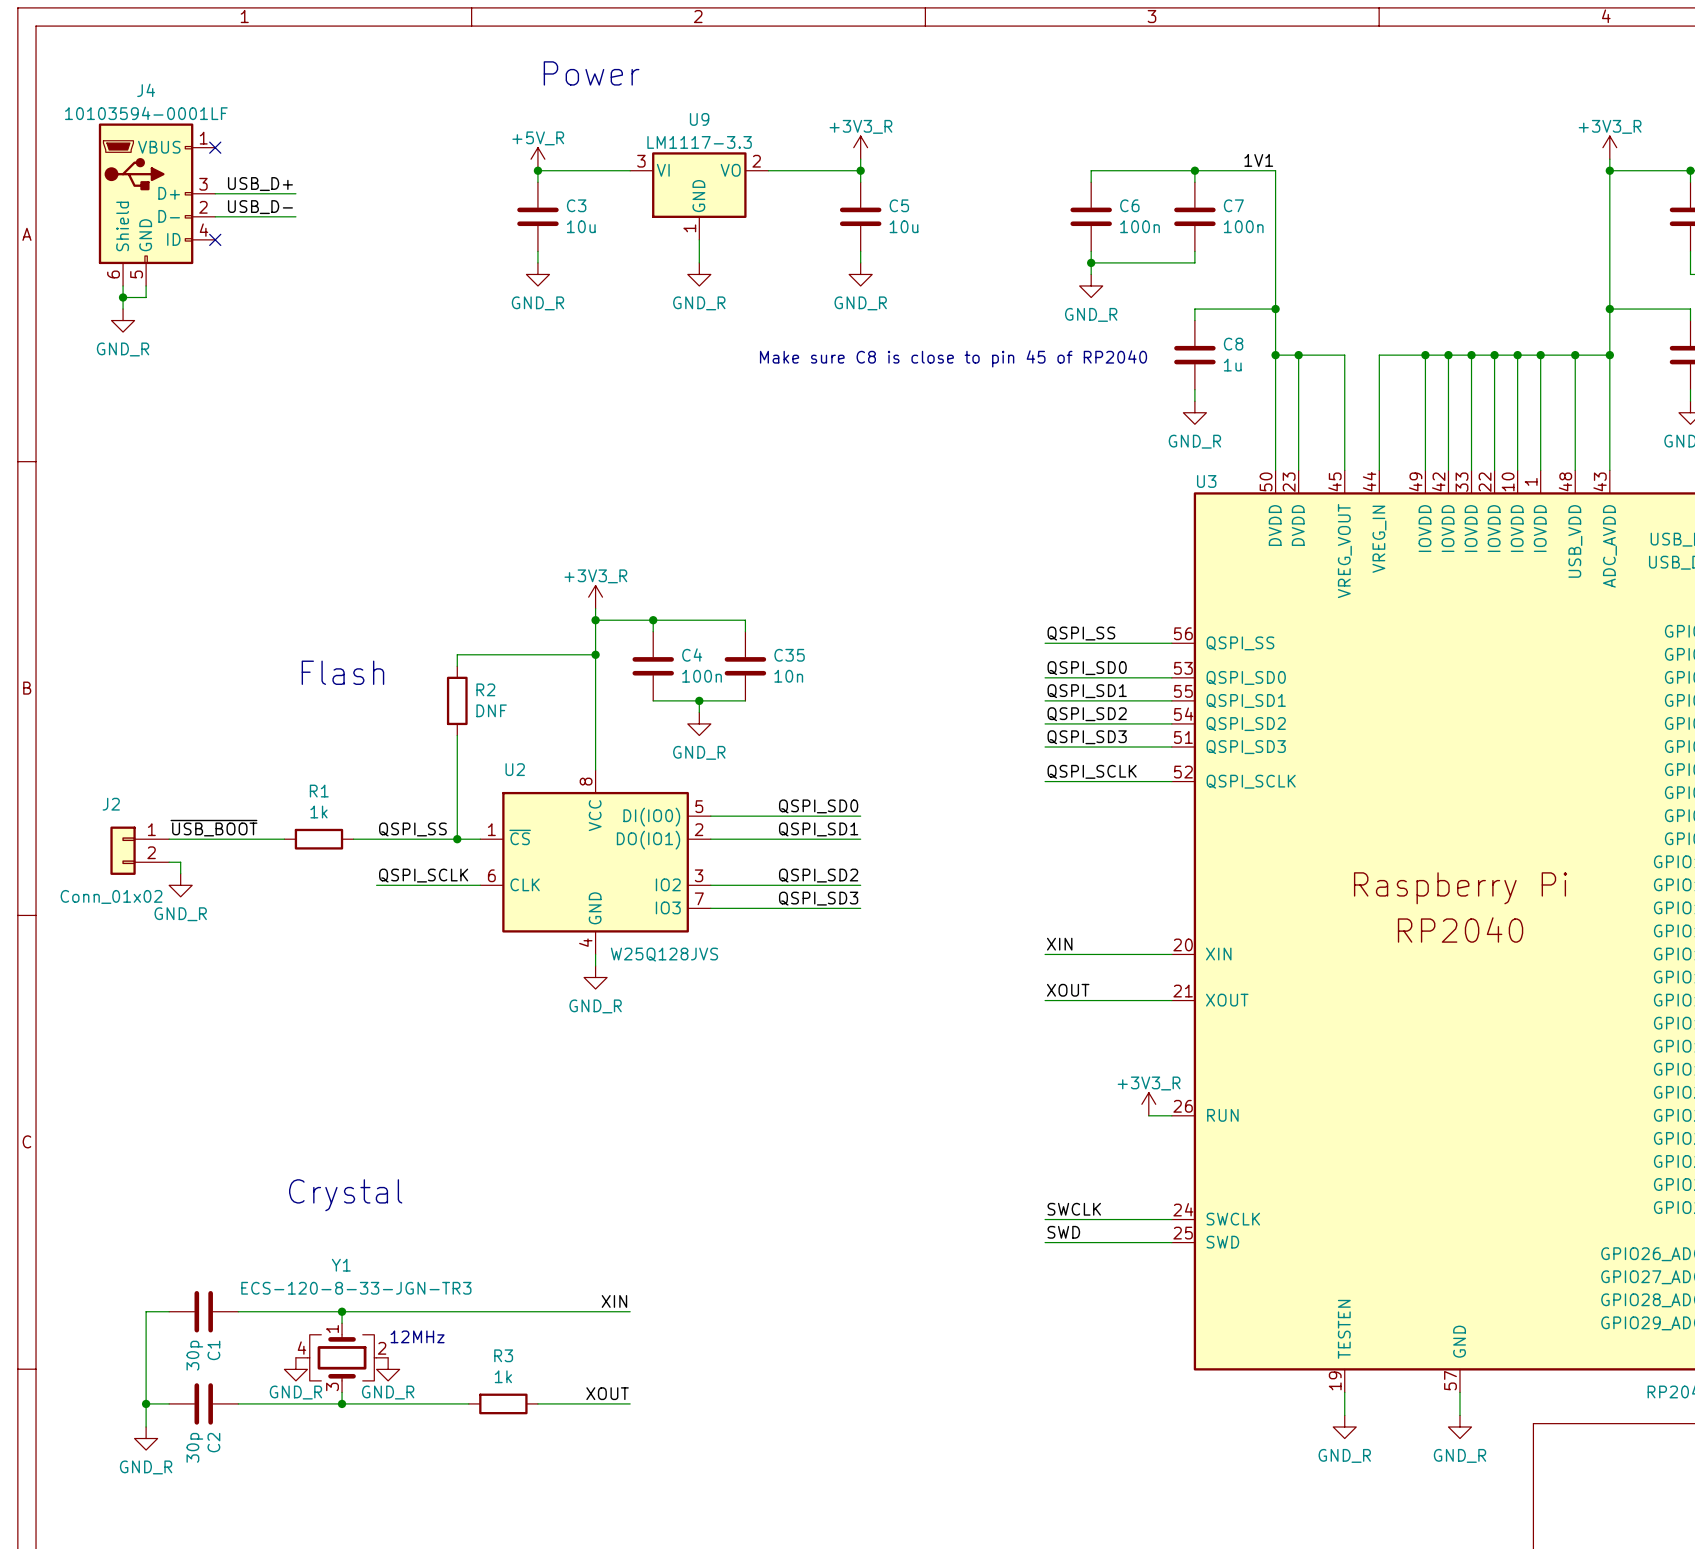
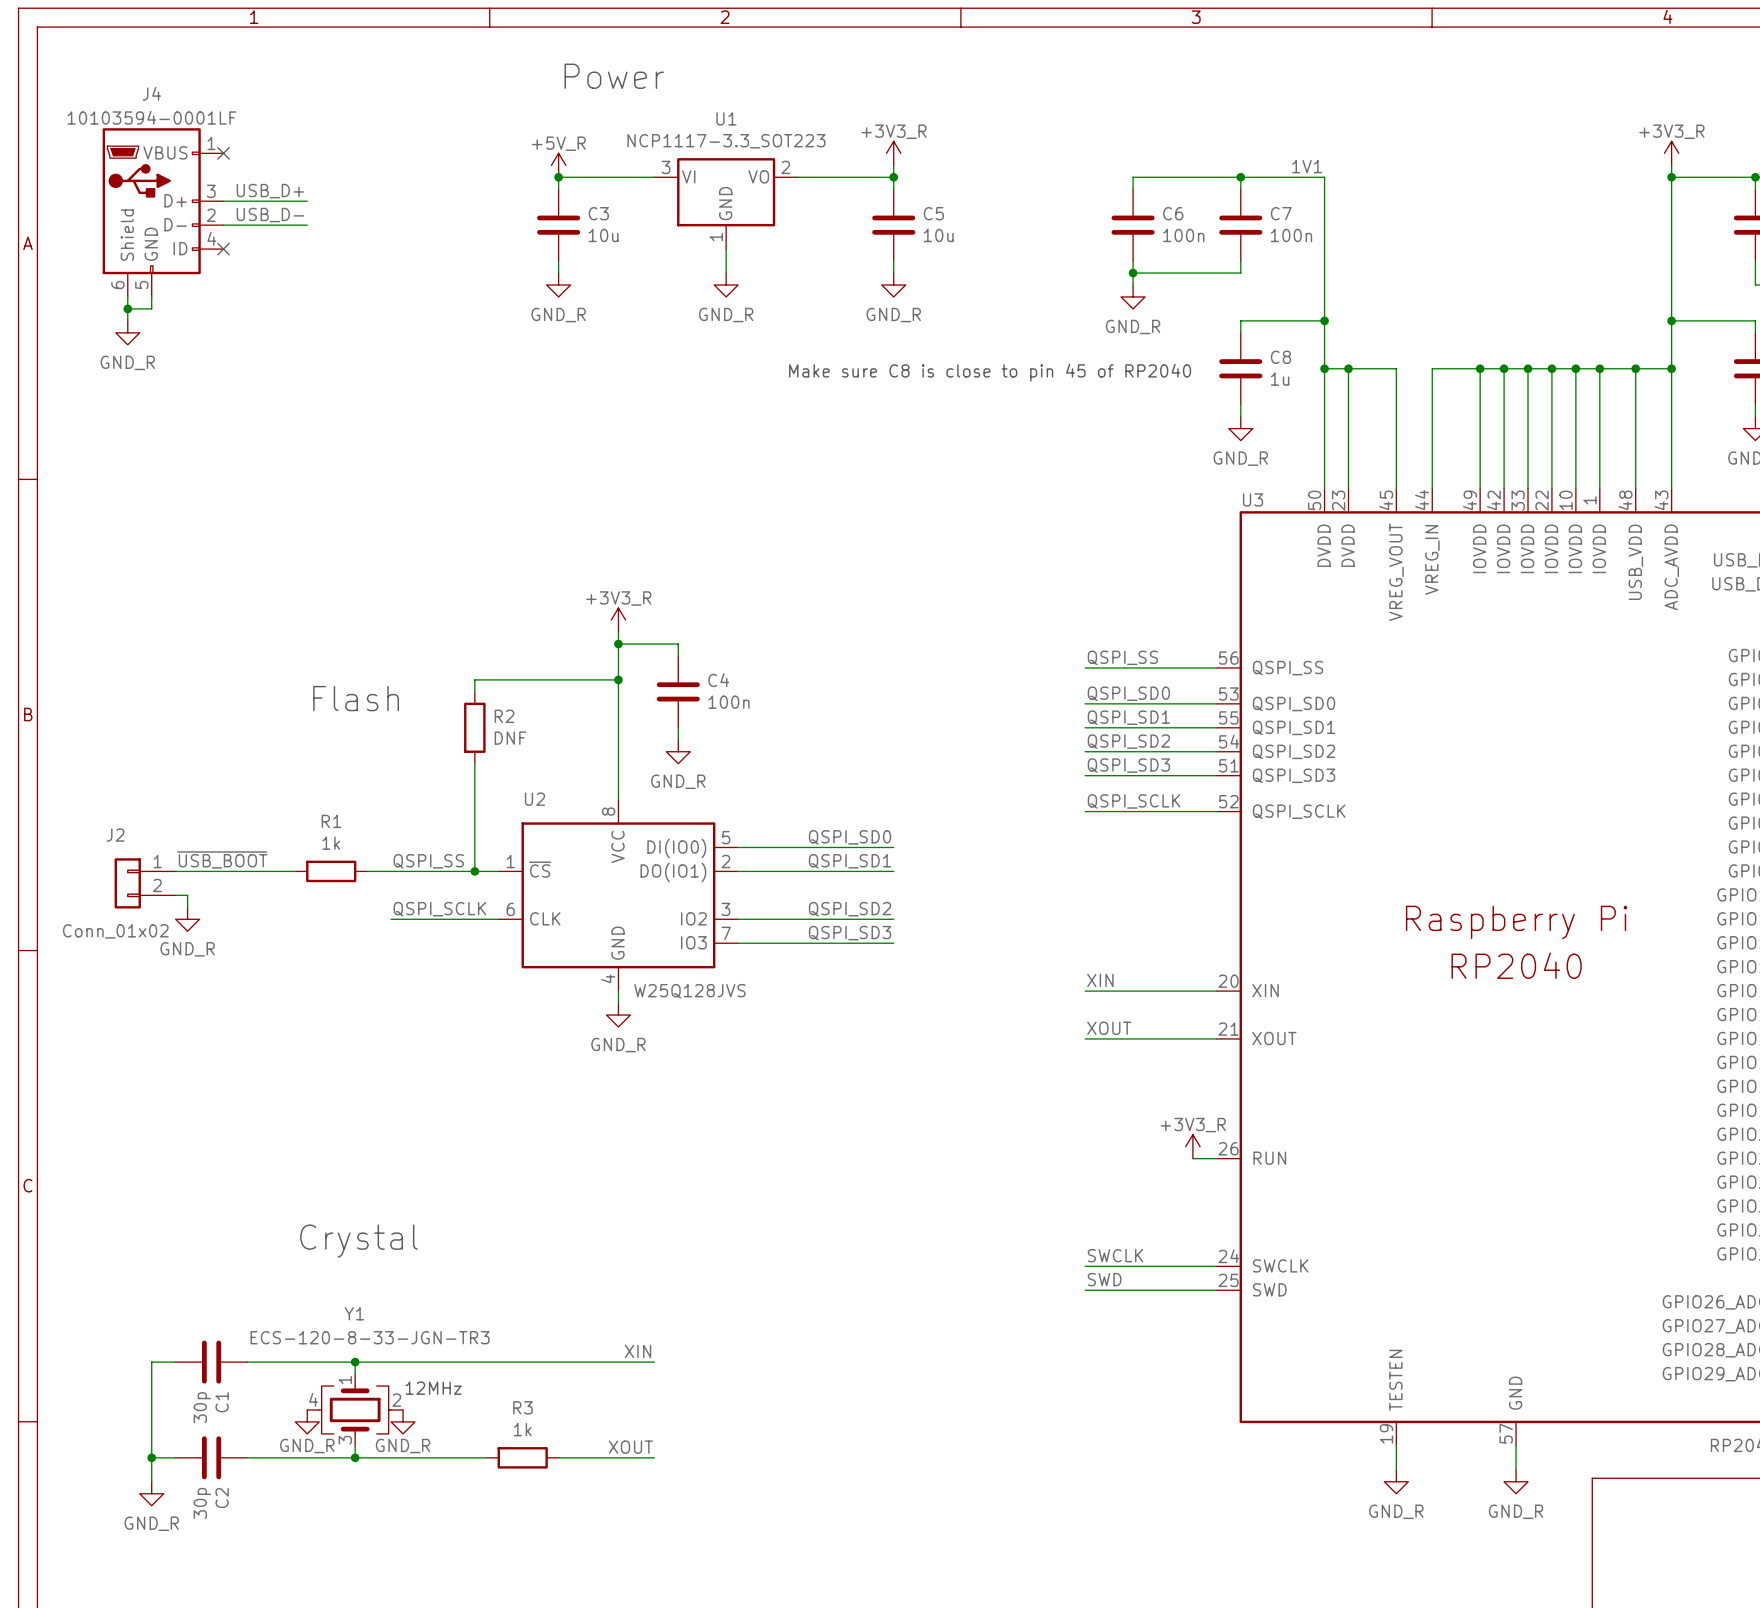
U9 name: U9 (699, 119) -> U1 (726, 118)
U9 value: LM1117-3.3 (699, 142) -> NCP1117-3.3_SOT223 (726, 141)
wire: (653, 620) (745, 620) (745, 631) -> none
junction: (653, 620) -> none
C35: 10n (745, 666) -> none
wire: (653, 700) (745, 700) -> (678, 727) (678, 739)
wire: (699, 700) (699, 712) -> none
junction: (699, 700) -> none
power symbol position: GND_R (699, 723) -> GND_R (678, 751)

